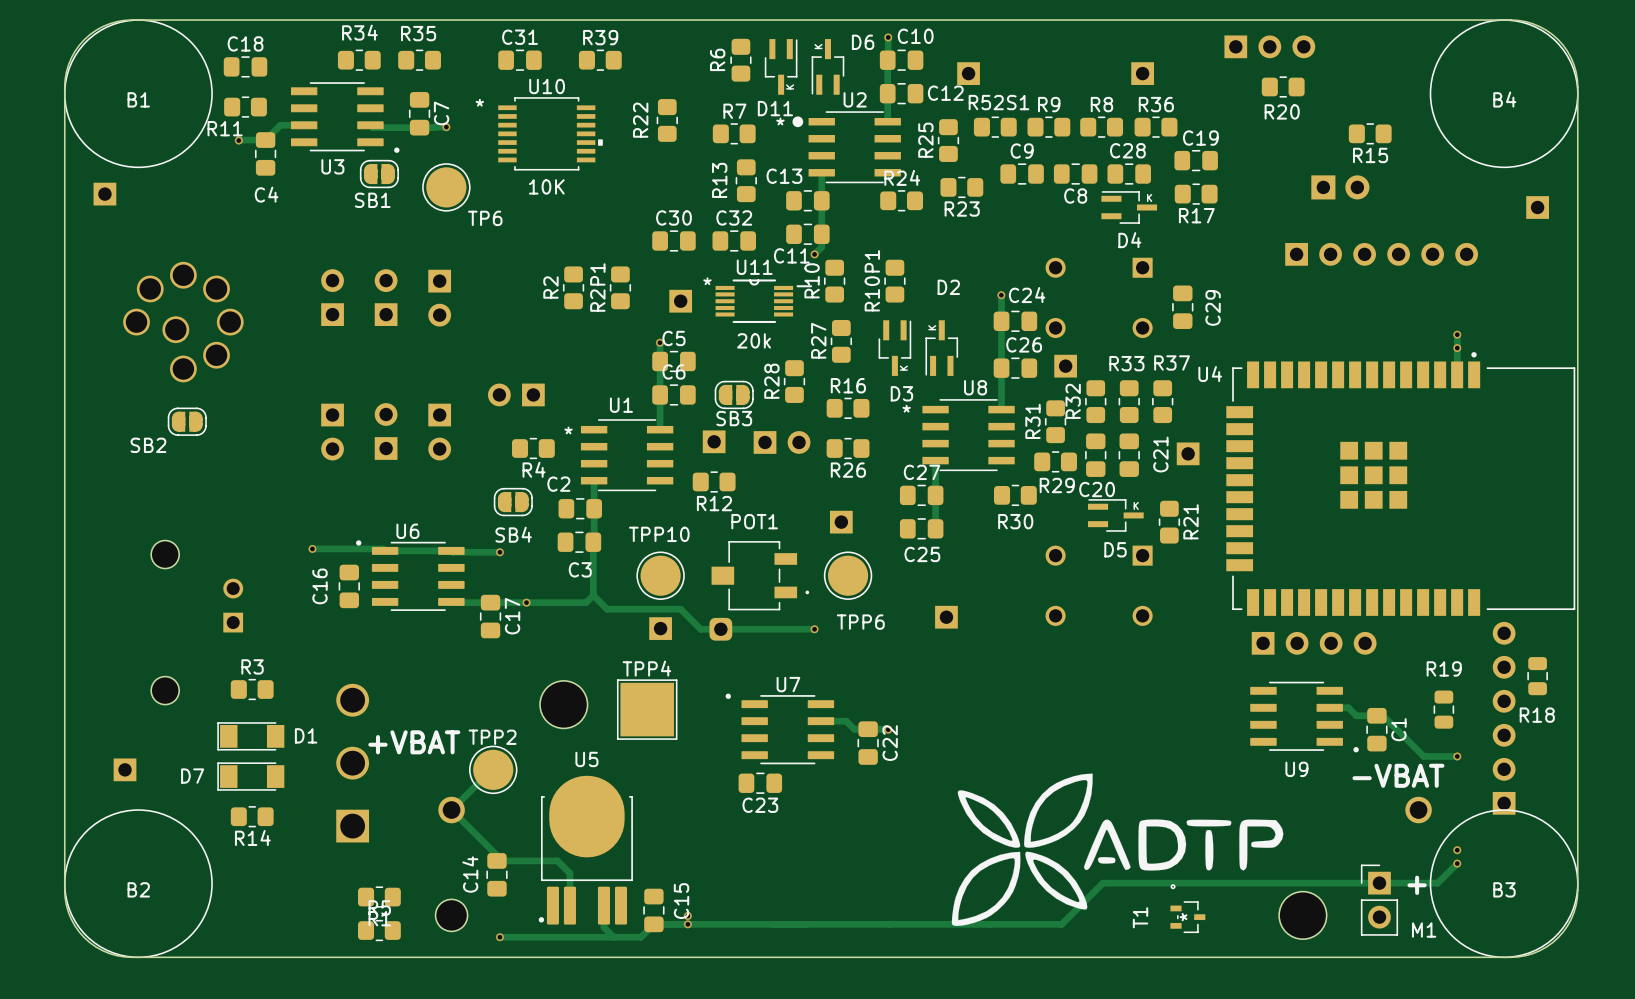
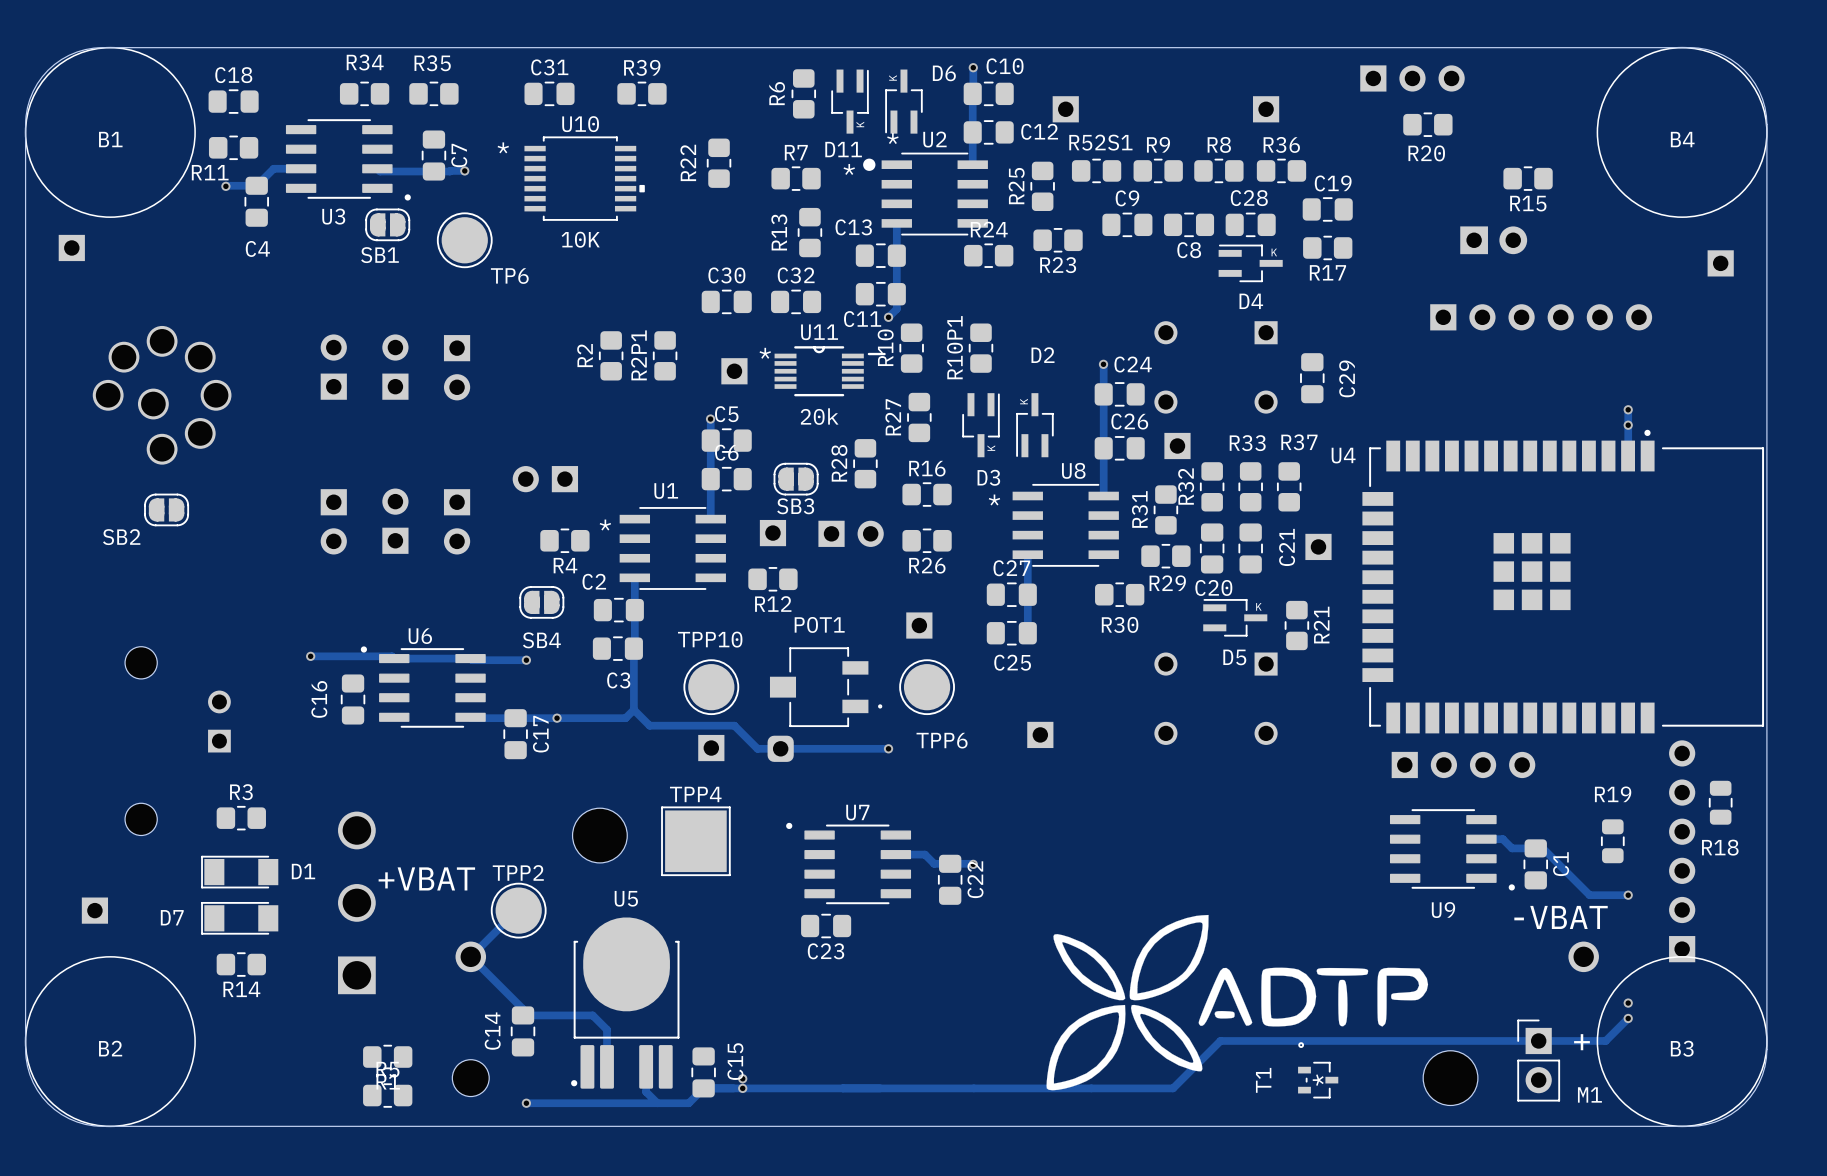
U2 text: none -> * (892, 138)

